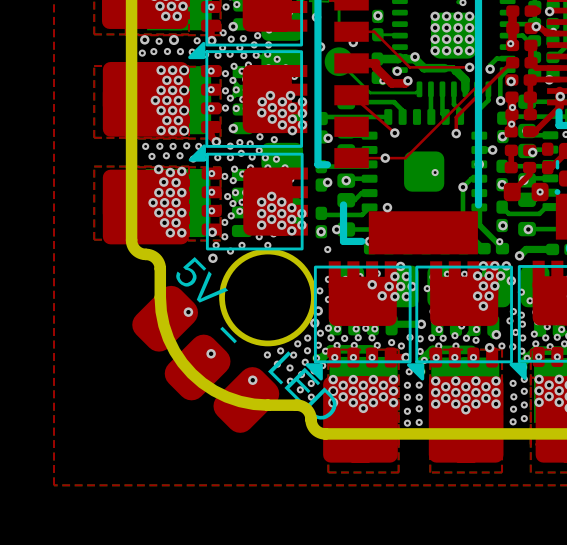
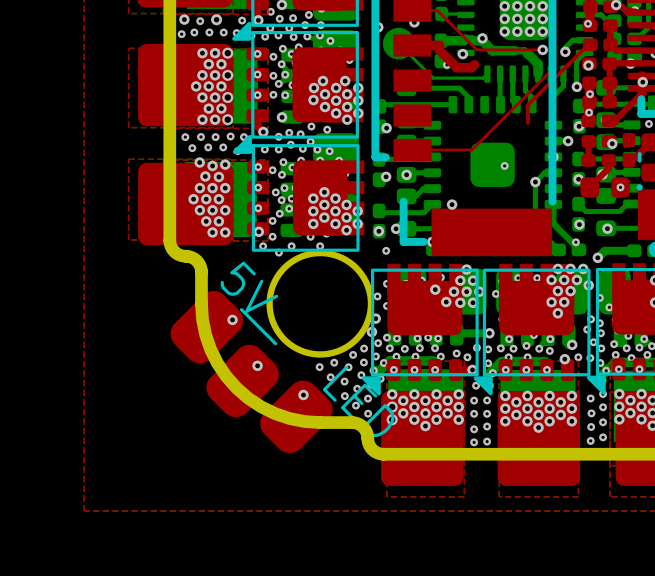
via: (407, 80) -> none
top track: (351, 95) (394, 133) -> none
via: (394, 133) -> none
via: (456, 133) -> none
via: (385, 158) -> none
via: (212, 258) -> none

